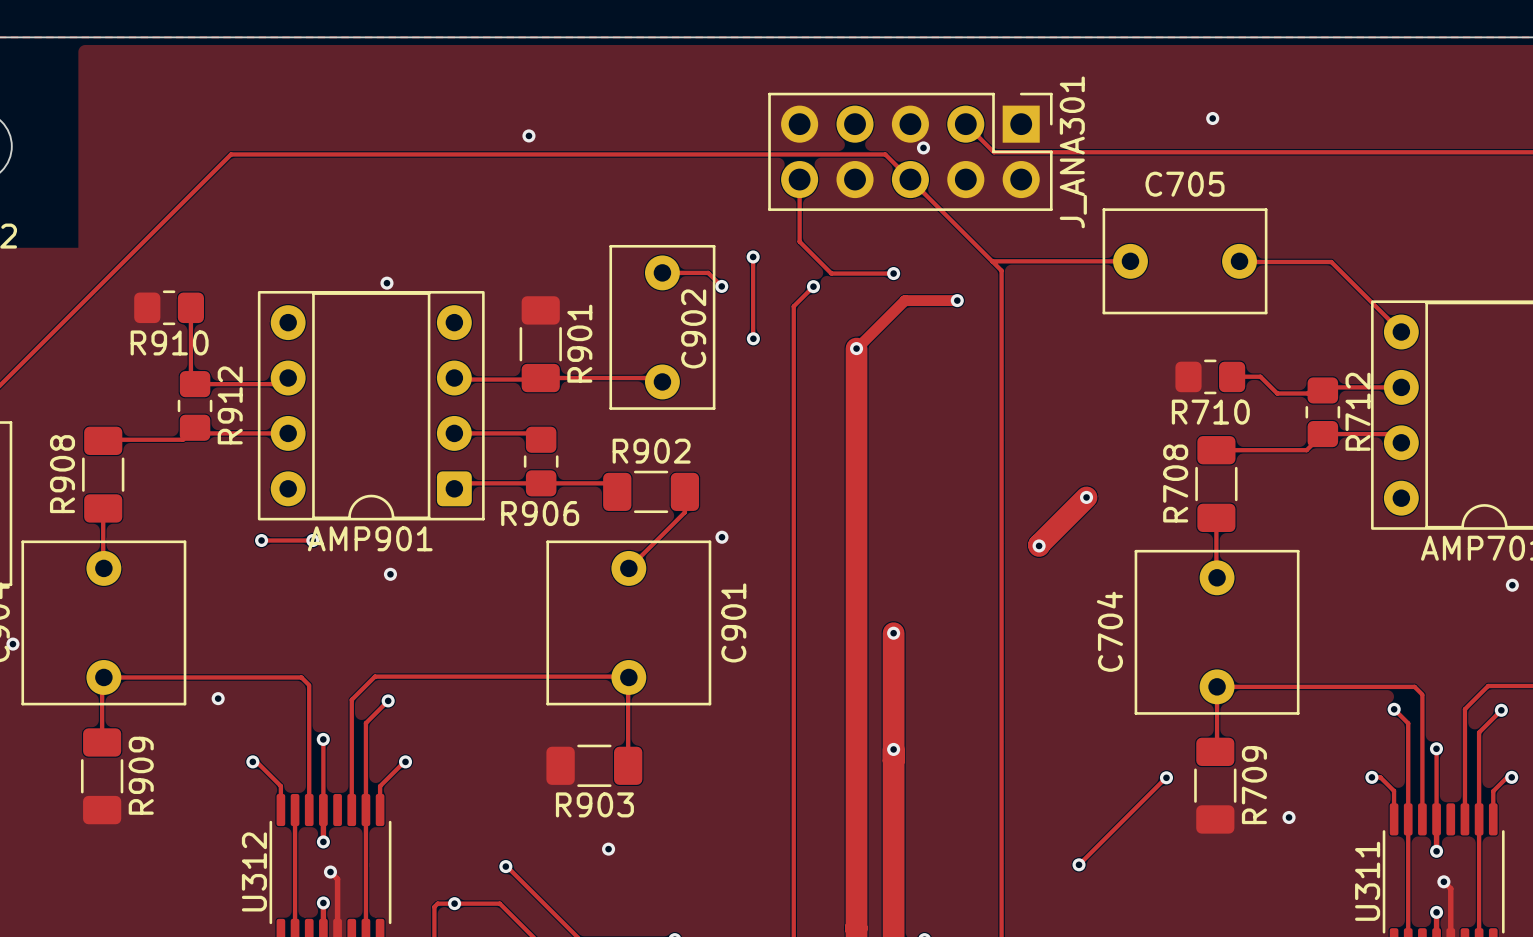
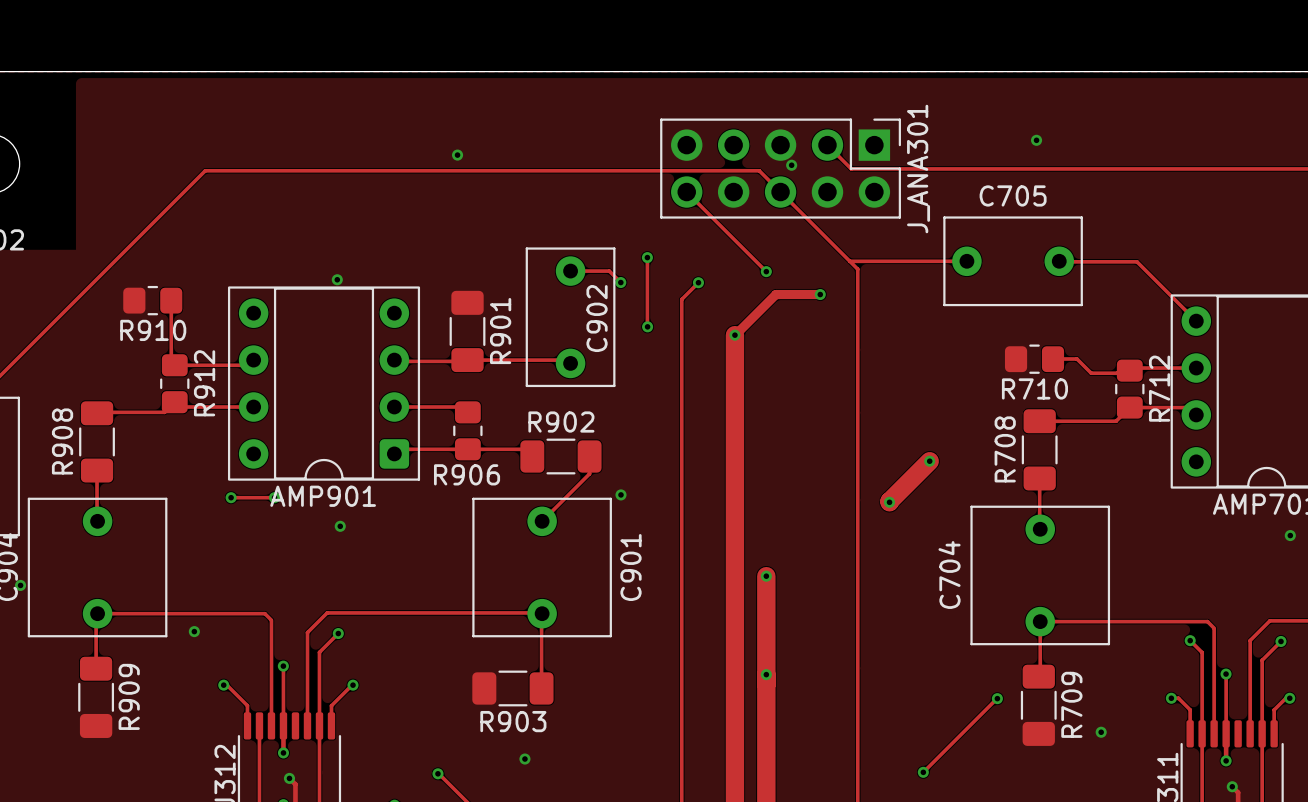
track: (799, 179) (799, 241) (831, 273) (893, 273) -> (686, 192) (766, 271)

